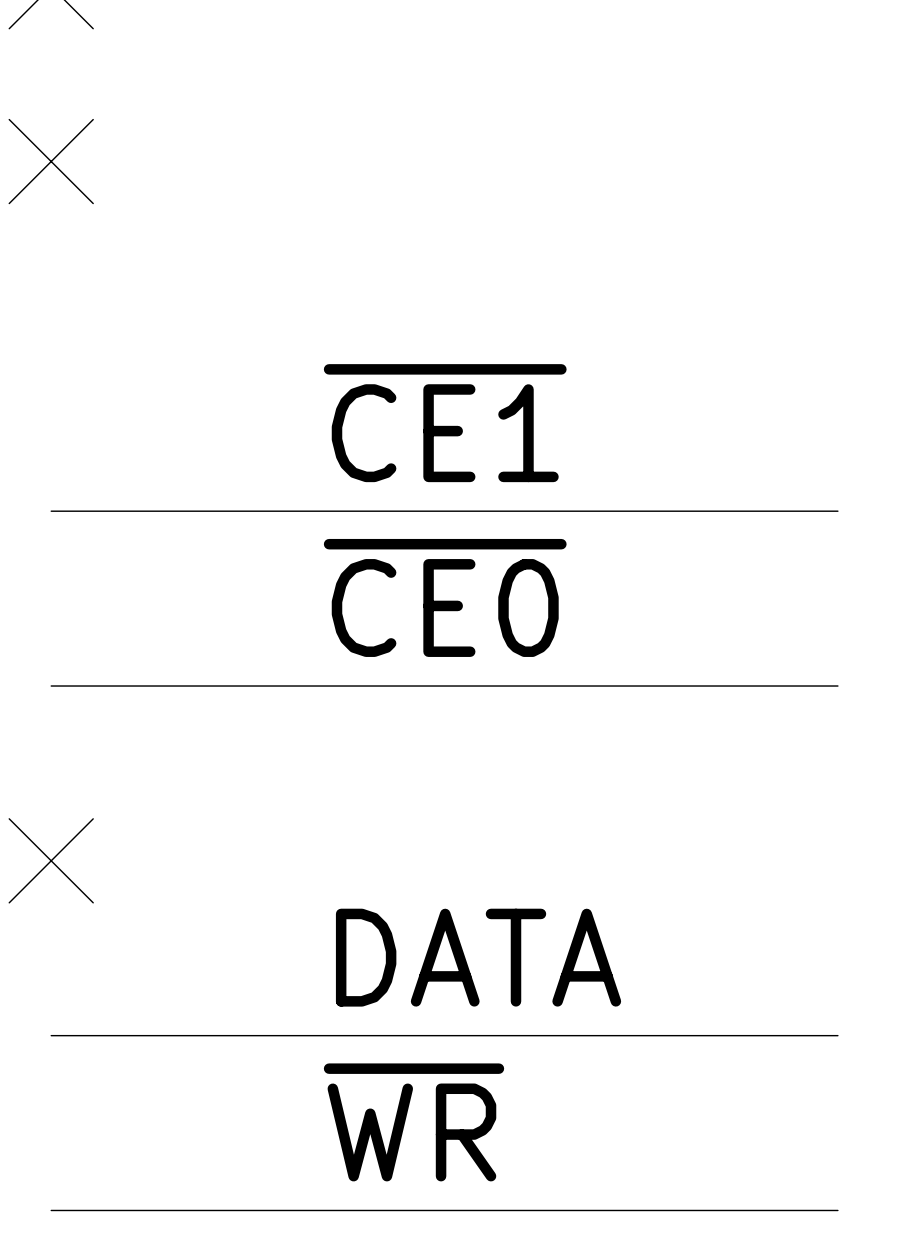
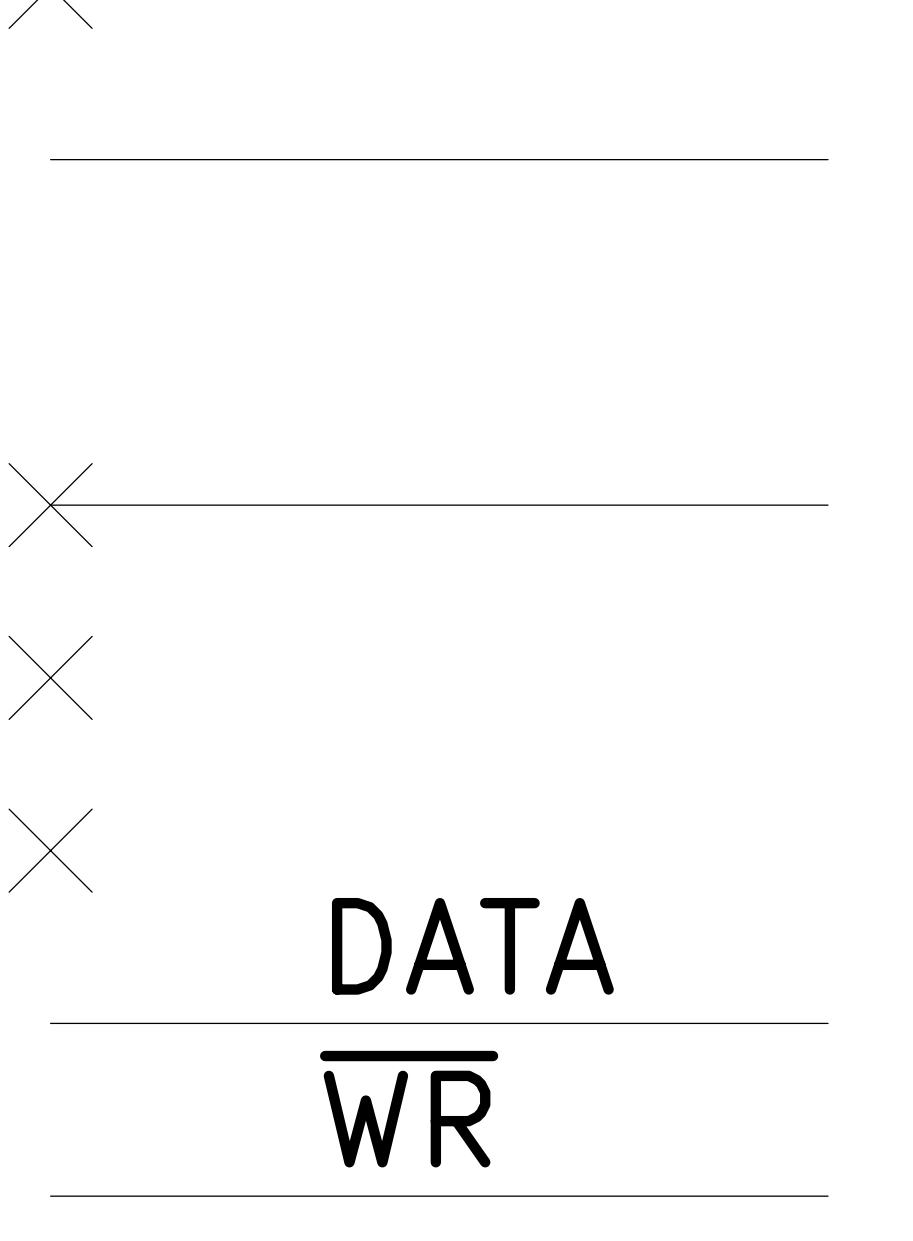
no-connect mark: (51, 161) -> none
label: ~{CE1} (445, 423) -> none
no-connect mark: none -> (50, 505)
label: ~{CE0} (445, 597) -> none
wire: (51, 686) (837, 686) -> (50, 159) (828, 159)
no-connect mark: none -> (50, 677)

